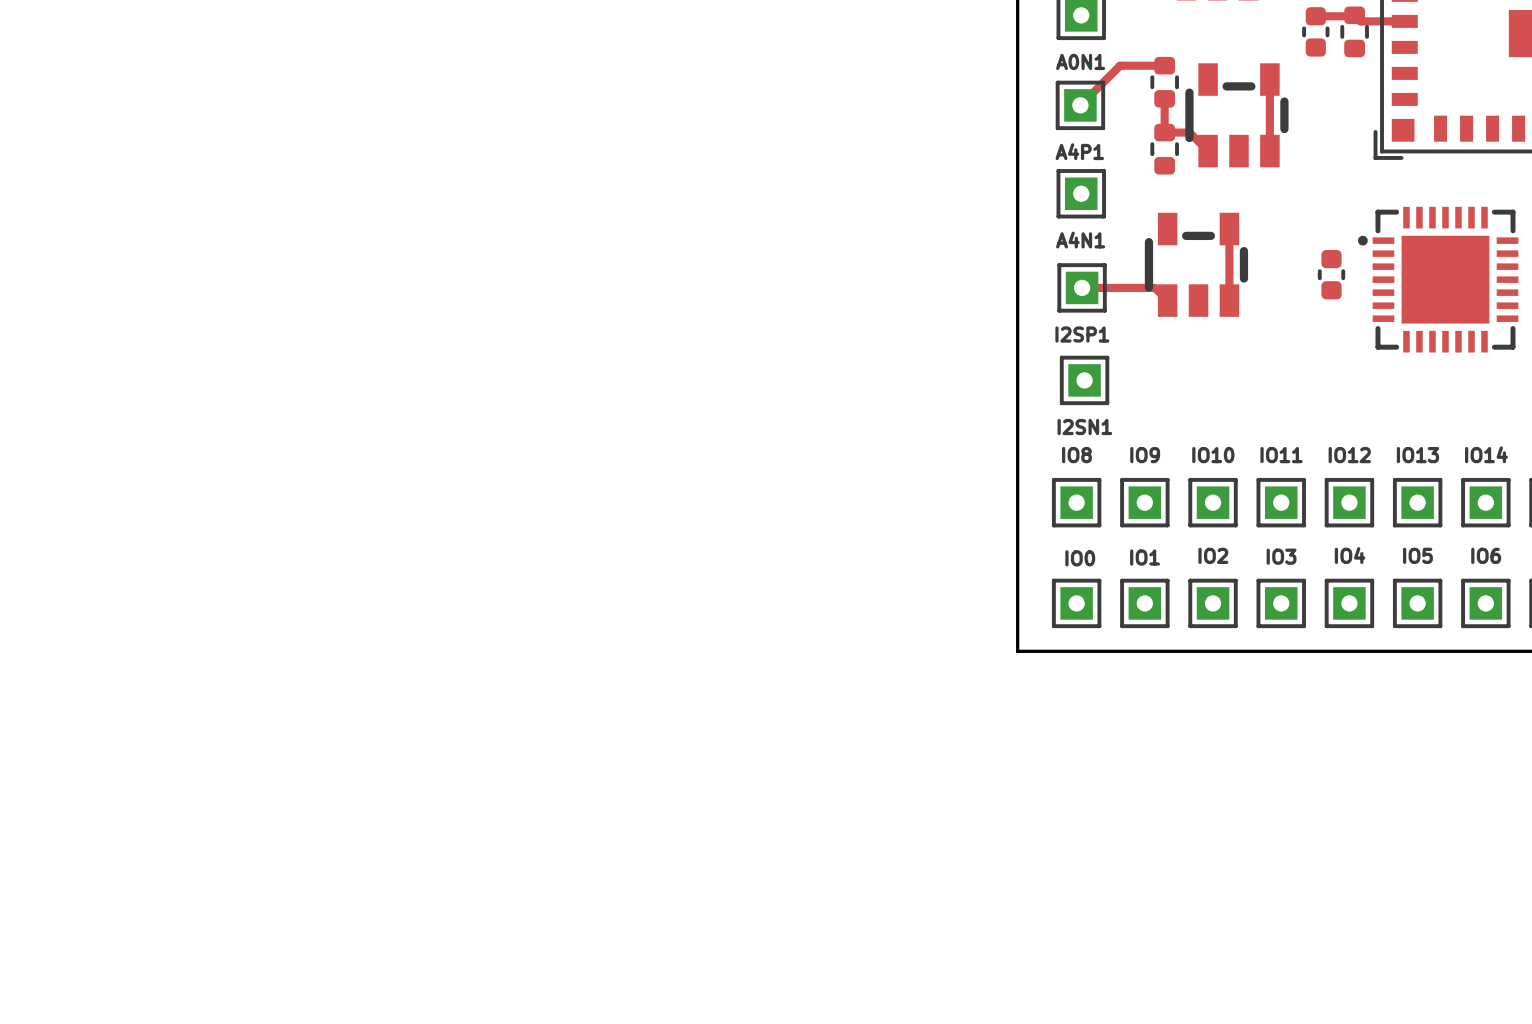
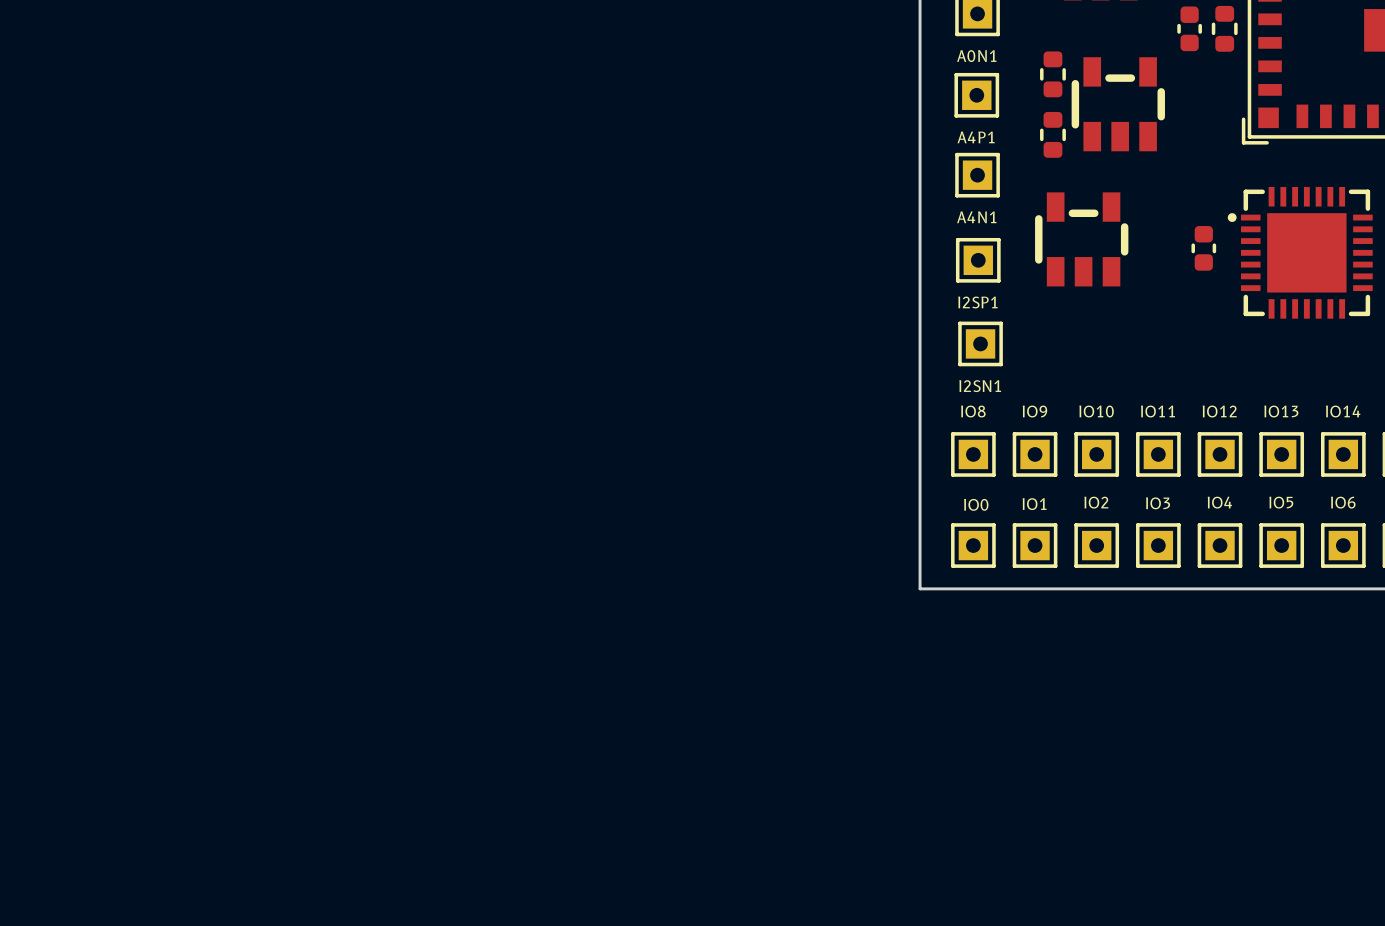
track: (1315, 16) (1354, 15) (1360, 21) (1404, 21) -> none
track: (1164, 65) (1120, 65) (1080, 105) -> none
track: (1269, 79) (1269, 151) -> none
track: (1164, 98) (1164, 132) (1189, 132) (1208, 151) -> none
track: (1229, 229) (1229, 300) -> none
track: (1082, 287) (1154, 287) (1167, 300) -> none

